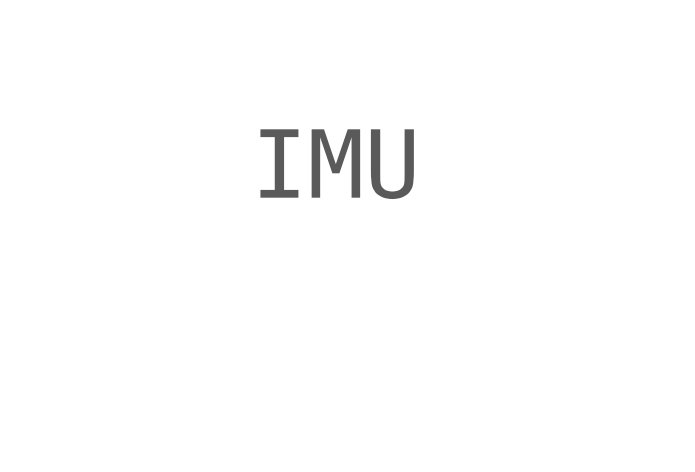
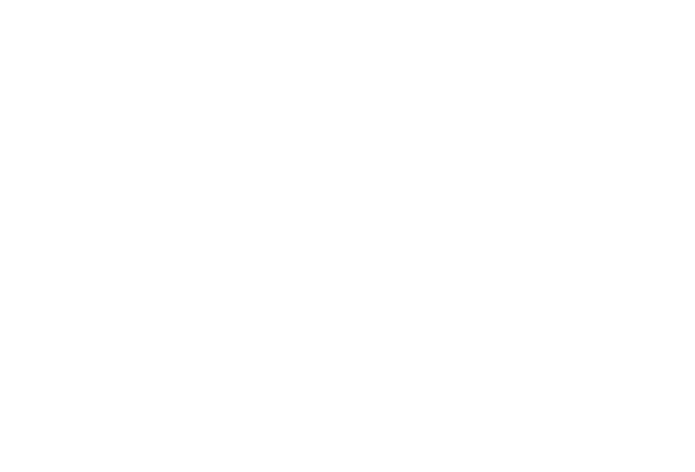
text: IMU (337, 164) -> none

